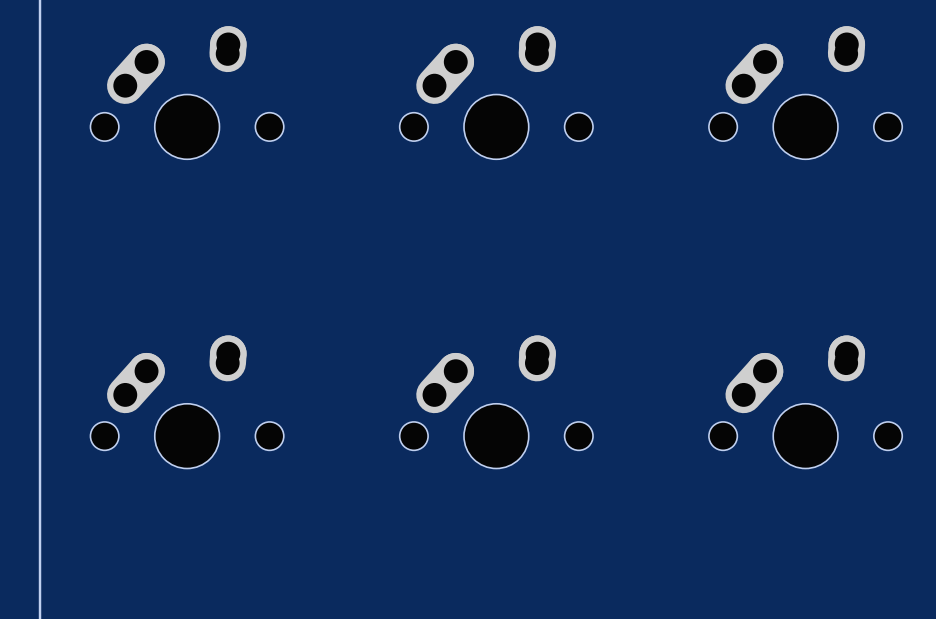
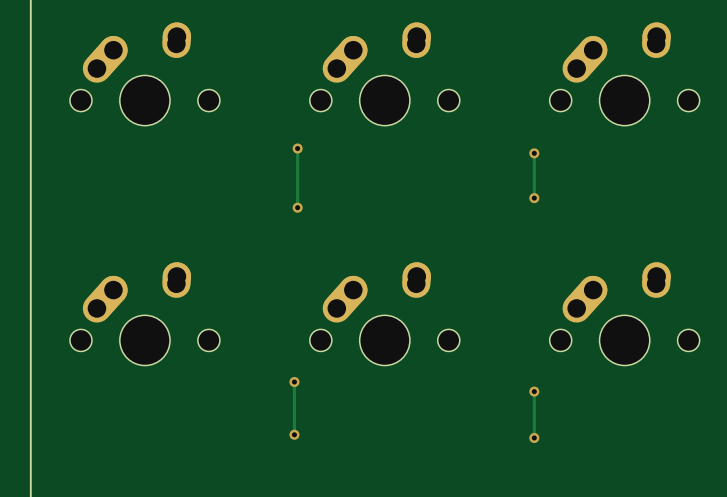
track: none -> (297, 148) (297, 207)
via: none -> (297, 148)
track: none -> (534, 153) (534, 198)
via: none -> (534, 153)
via: none -> (534, 198)
via: none -> (297, 207)
track: none -> (294, 382) (294, 434)
via: none -> (294, 382)
track: none -> (534, 391) (534, 437)
via: none -> (534, 391)
via: none -> (294, 434)
via: none -> (534, 437)

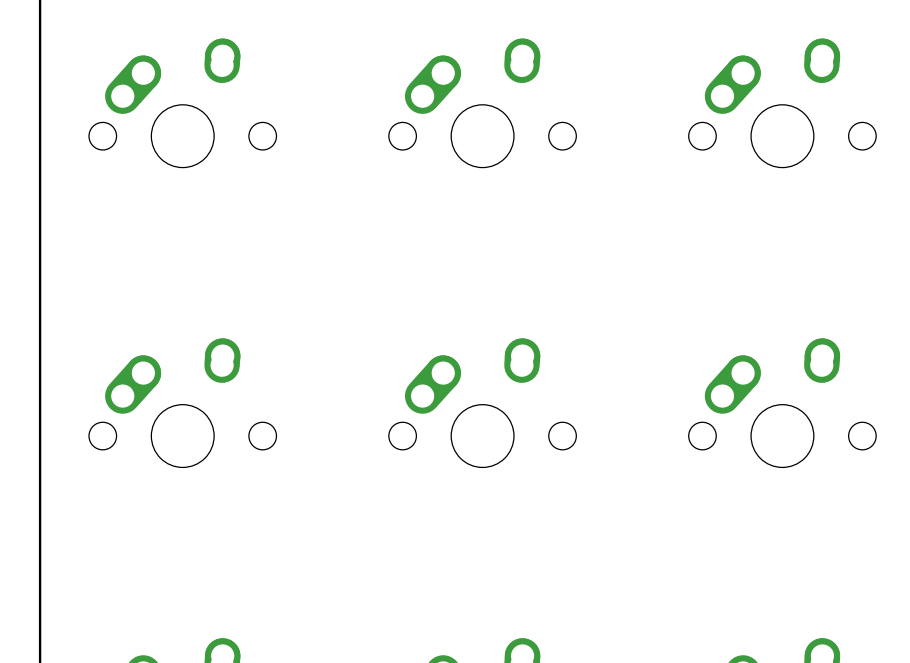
track: (297, 148) (297, 207) -> none
via: (297, 148) -> none
track: (534, 153) (534, 198) -> none
via: (534, 153) -> none
via: (534, 198) -> none
via: (297, 207) -> none
track: (294, 382) (294, 434) -> none
via: (294, 382) -> none
track: (534, 391) (534, 437) -> none
via: (534, 391) -> none
via: (294, 434) -> none
via: (534, 437) -> none

